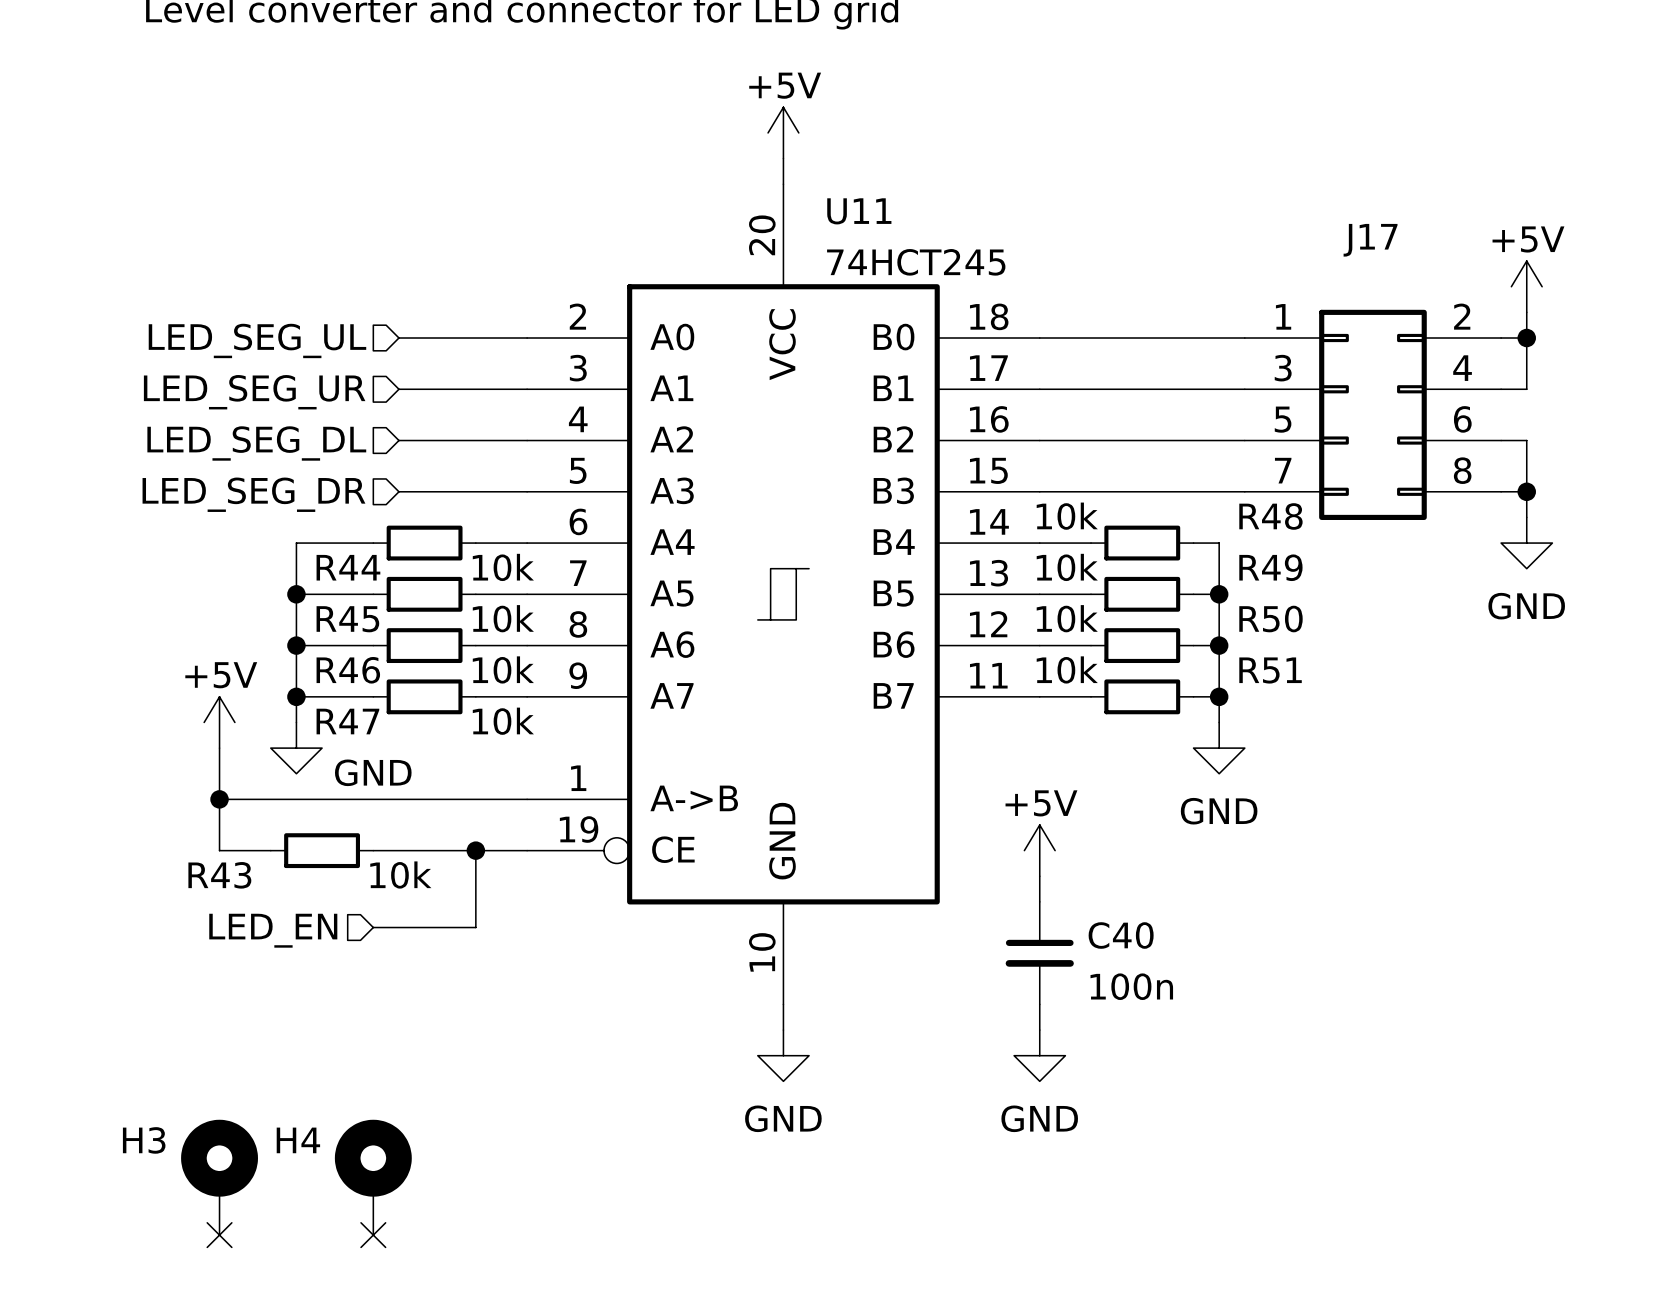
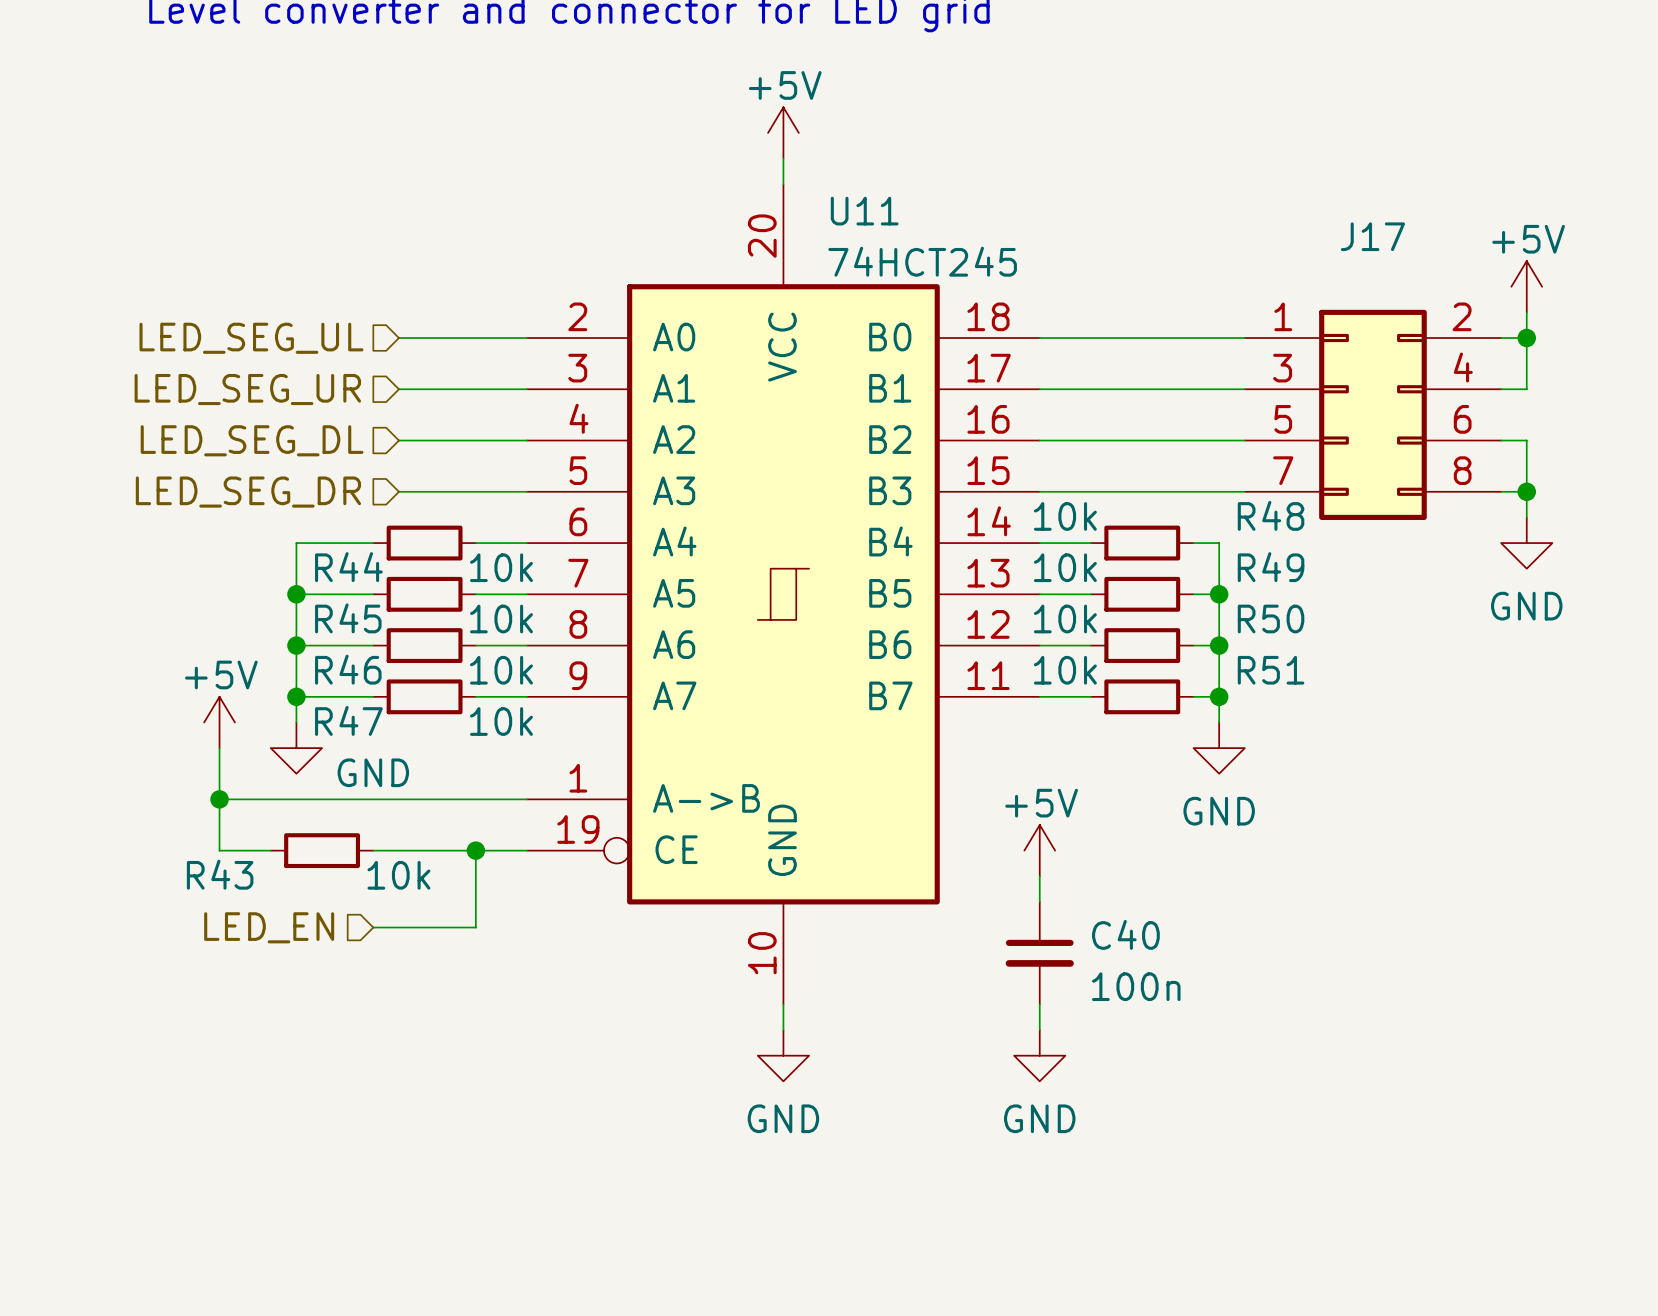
H3: (219, 1177) -> none
H4: (373, 1177) -> none
no-connect mark: (219, 1235) -> none
no-connect mark: (373, 1235) -> none

